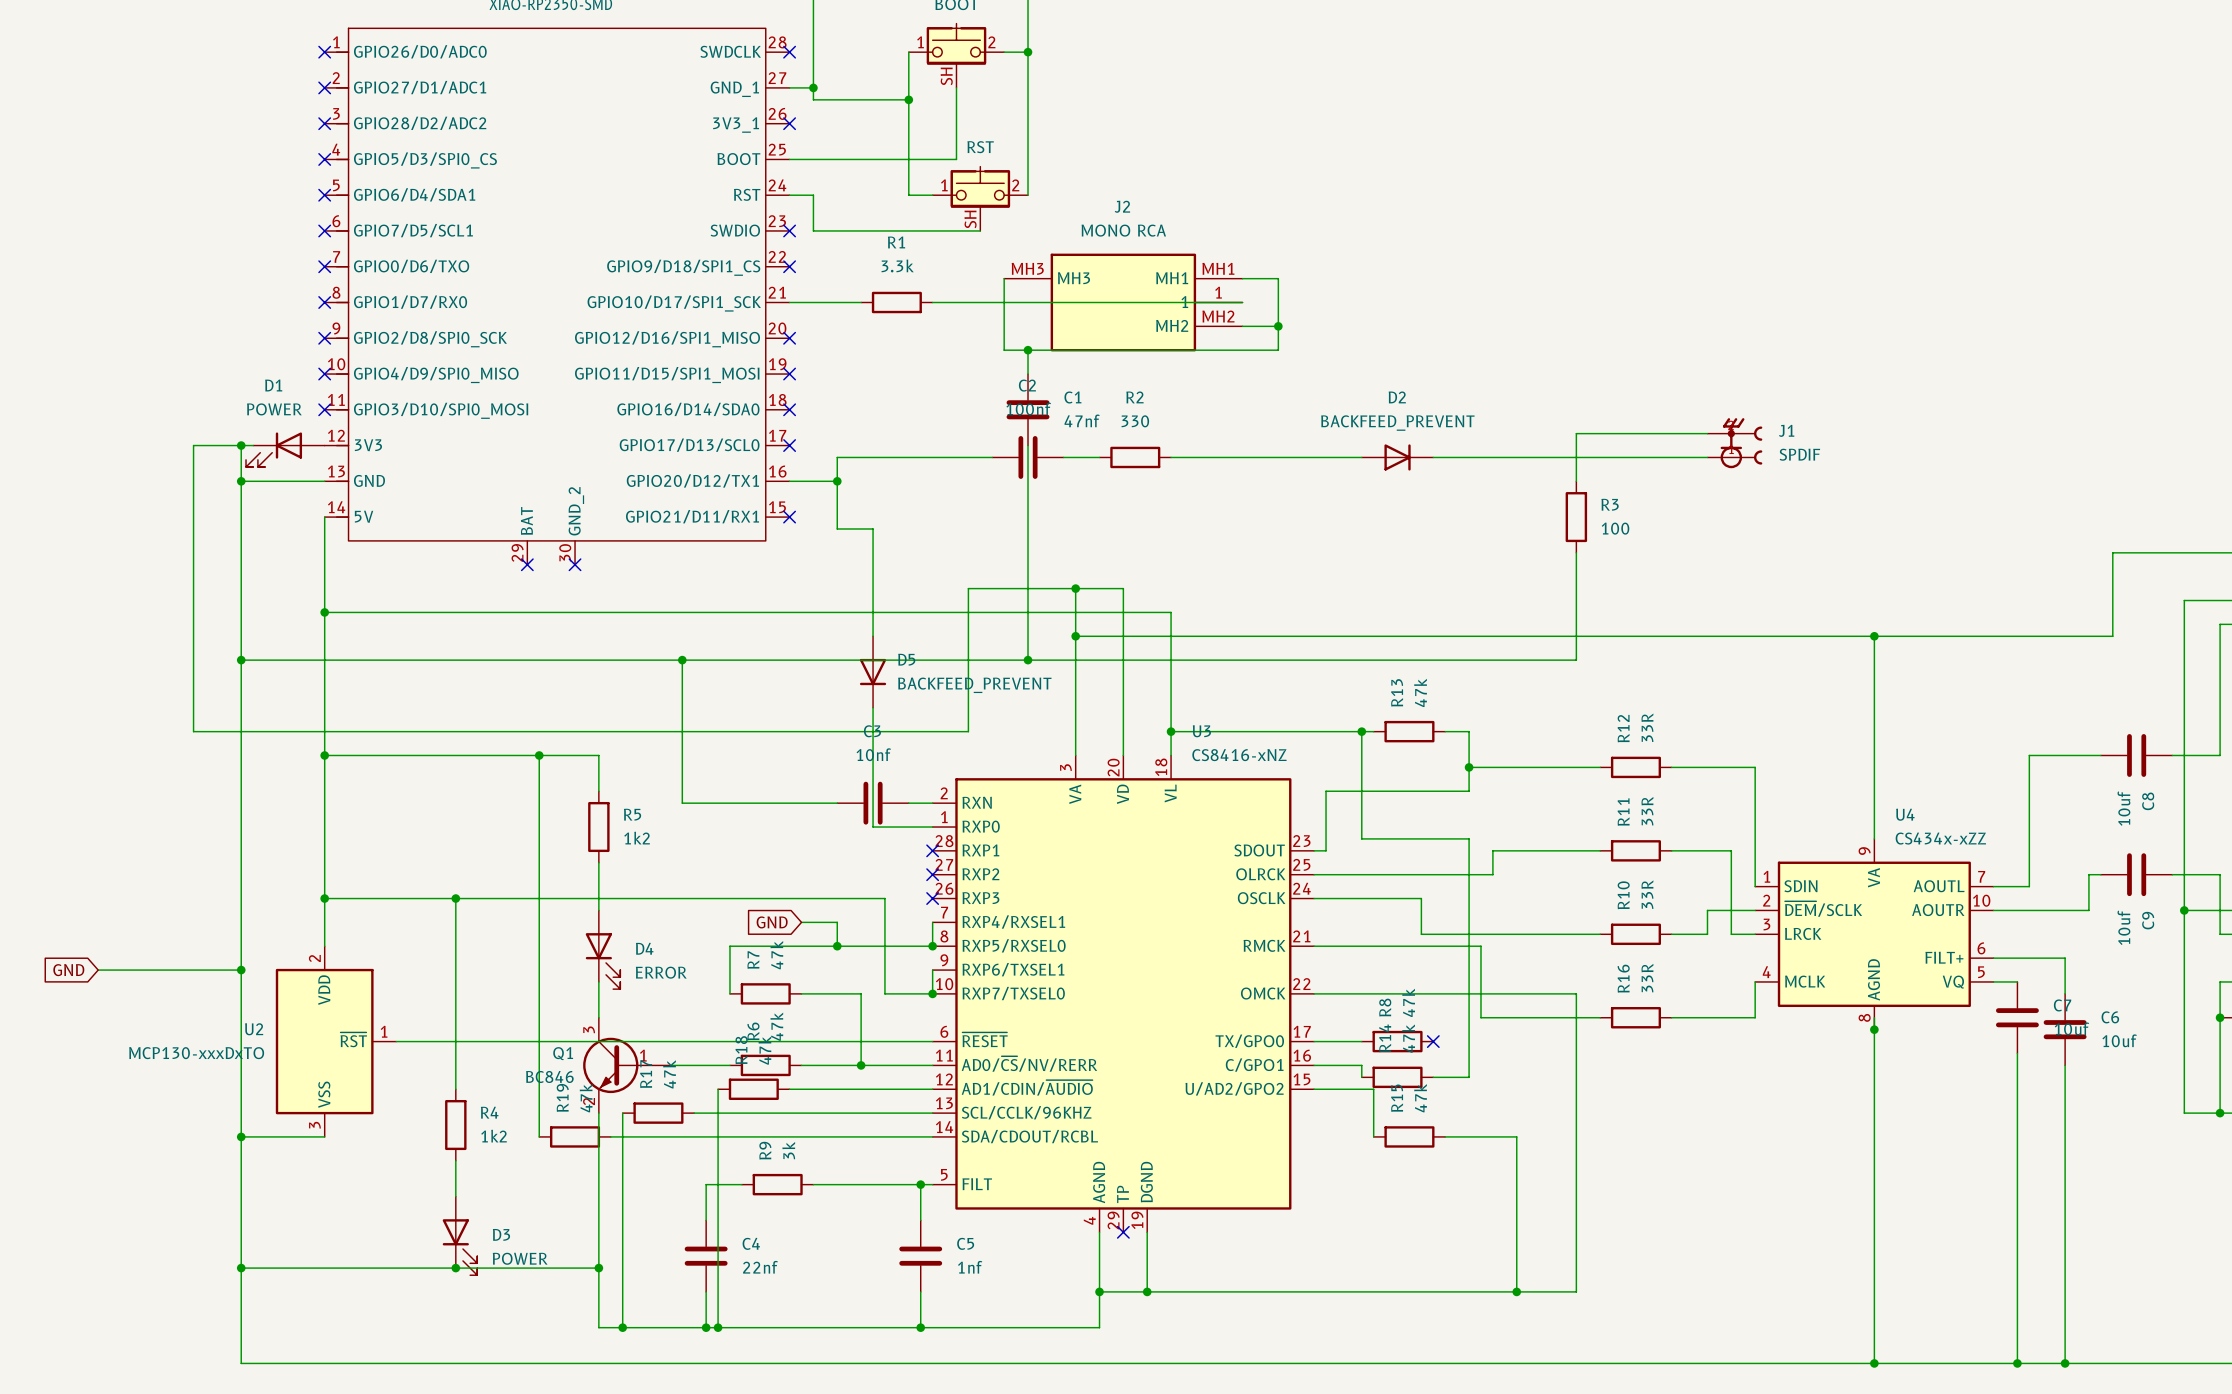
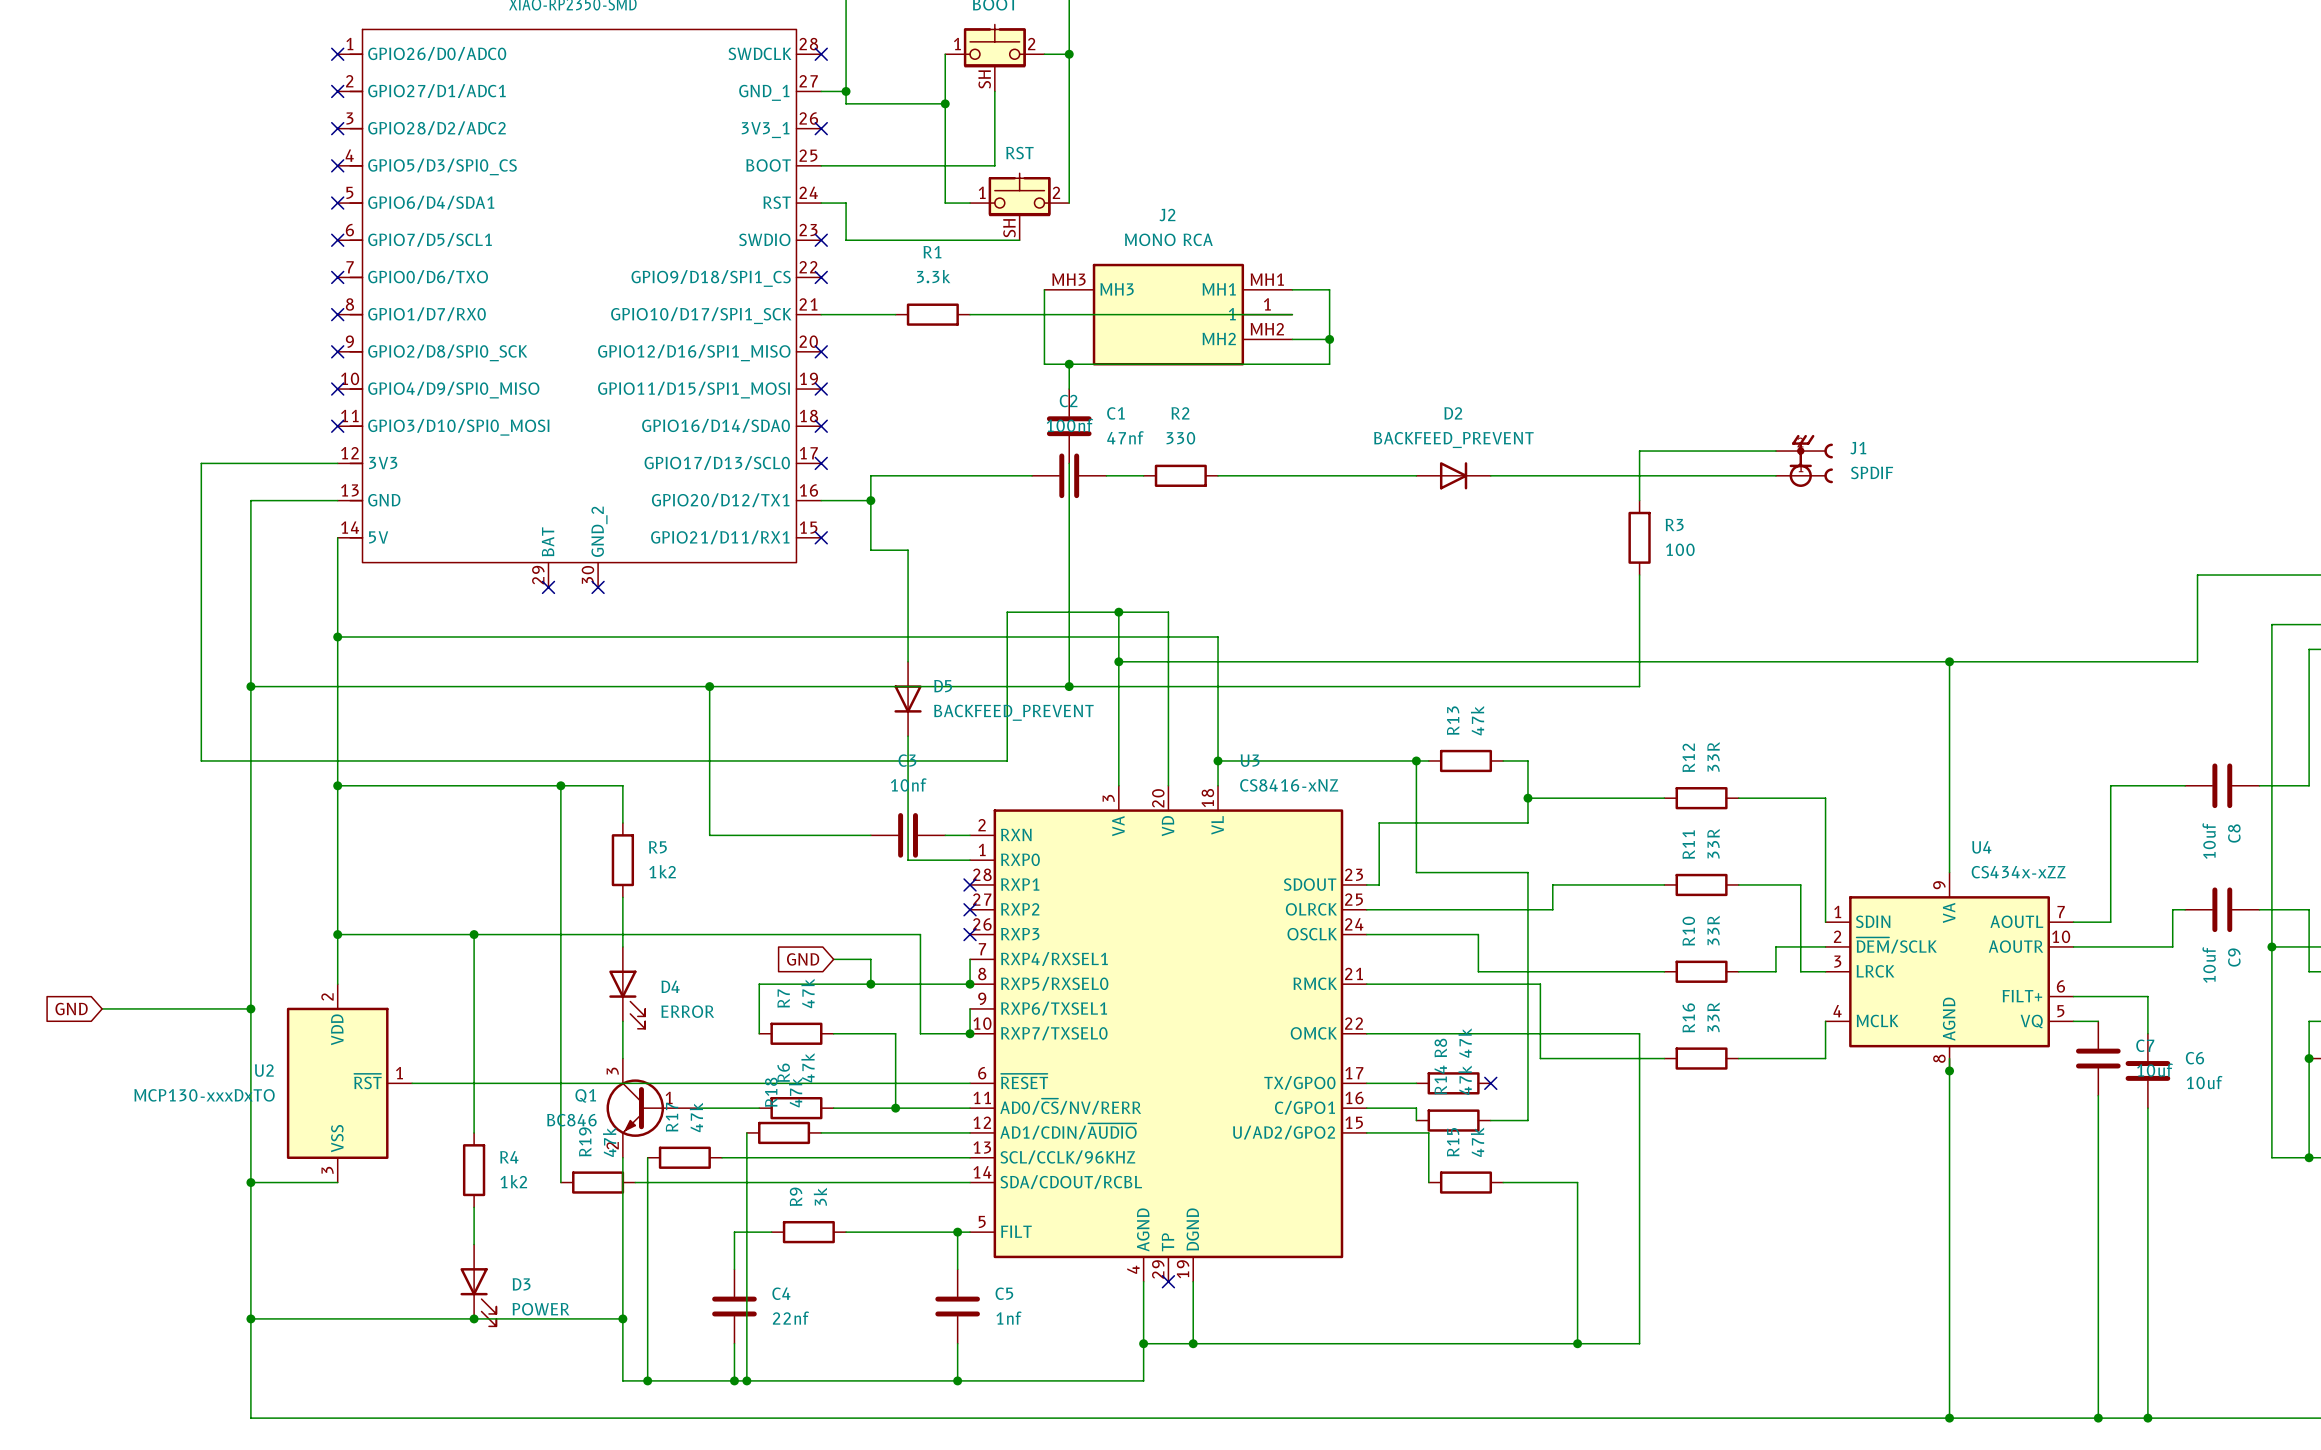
wire: (241, 445) (241, 481) -> none
junction: (241, 445) -> none
D1: POWER (285, 449) -> none
junction: (241, 481) -> none

